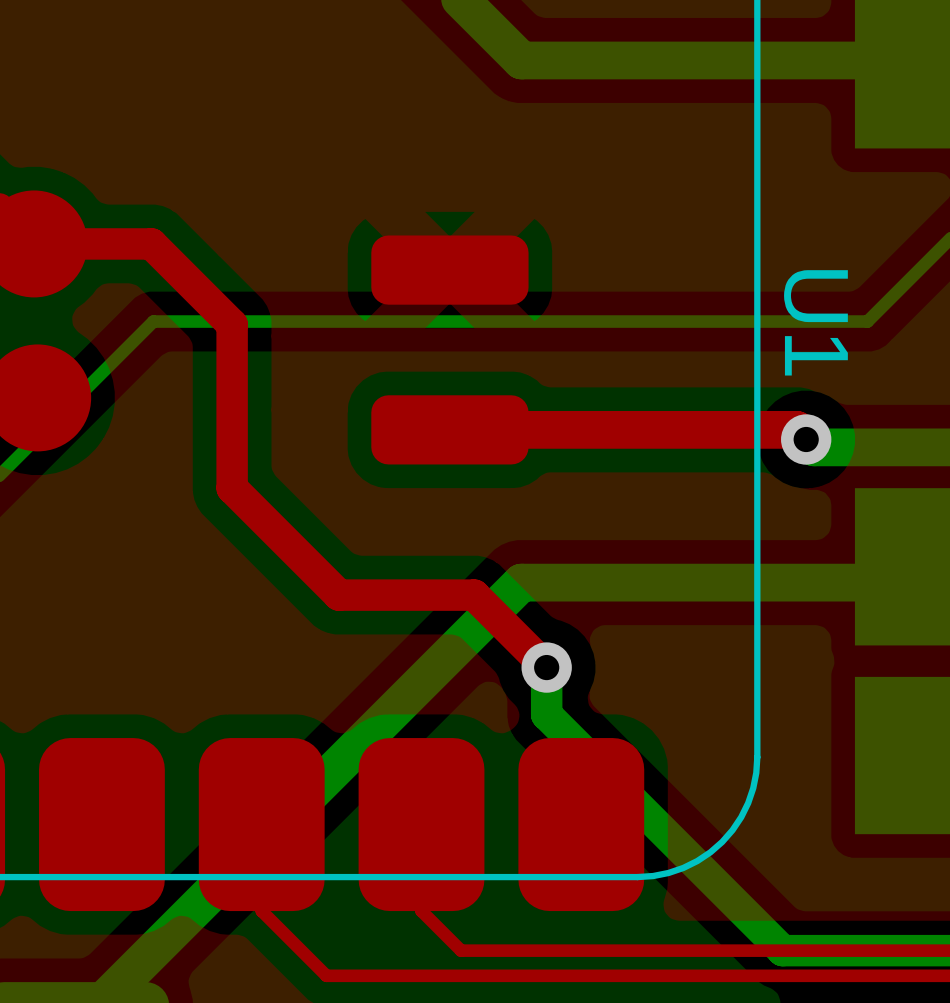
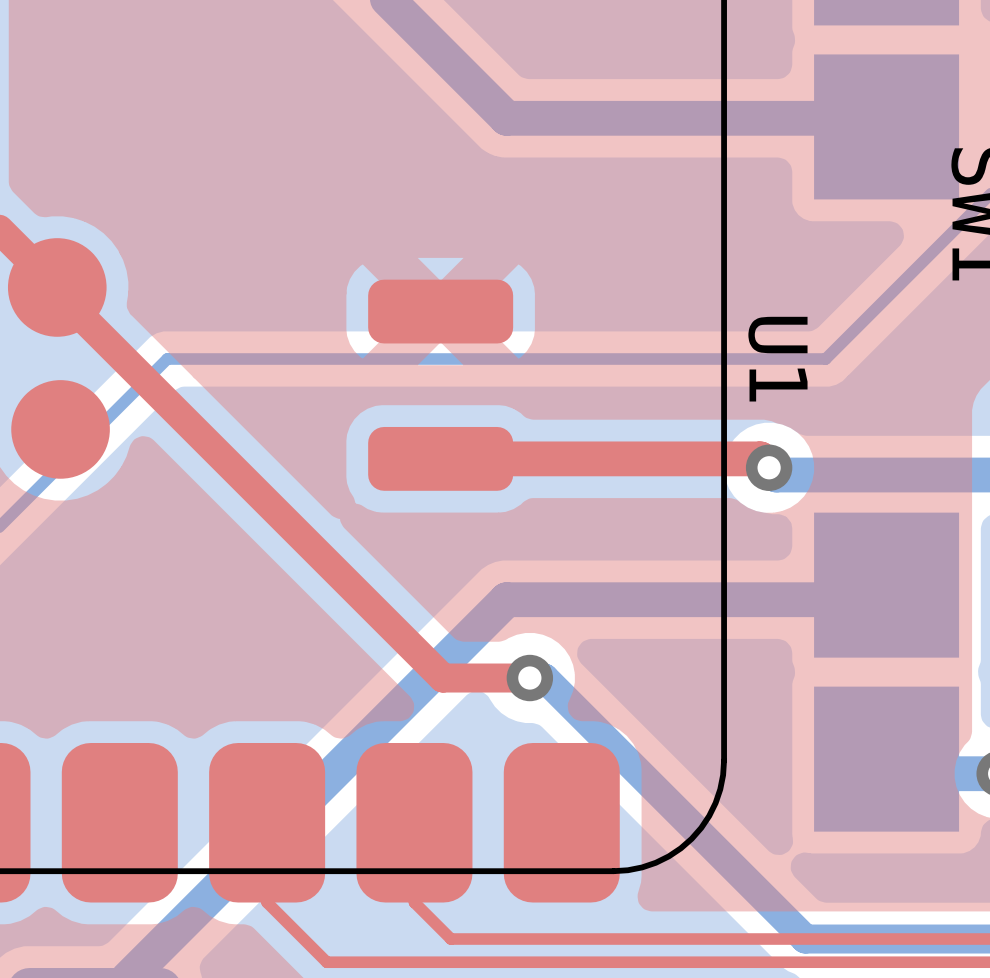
top track: (34, 243) (151, 243) (232, 324) (232, 488) (339, 595) (474, 595) (546, 667) -> (57, 287) (57, 292) (442, 678) (529, 678)
bottom track: (546, 667) (546, 714) (782, 950) (845, 950) -> (529, 678) (544, 678) (805, 939)

